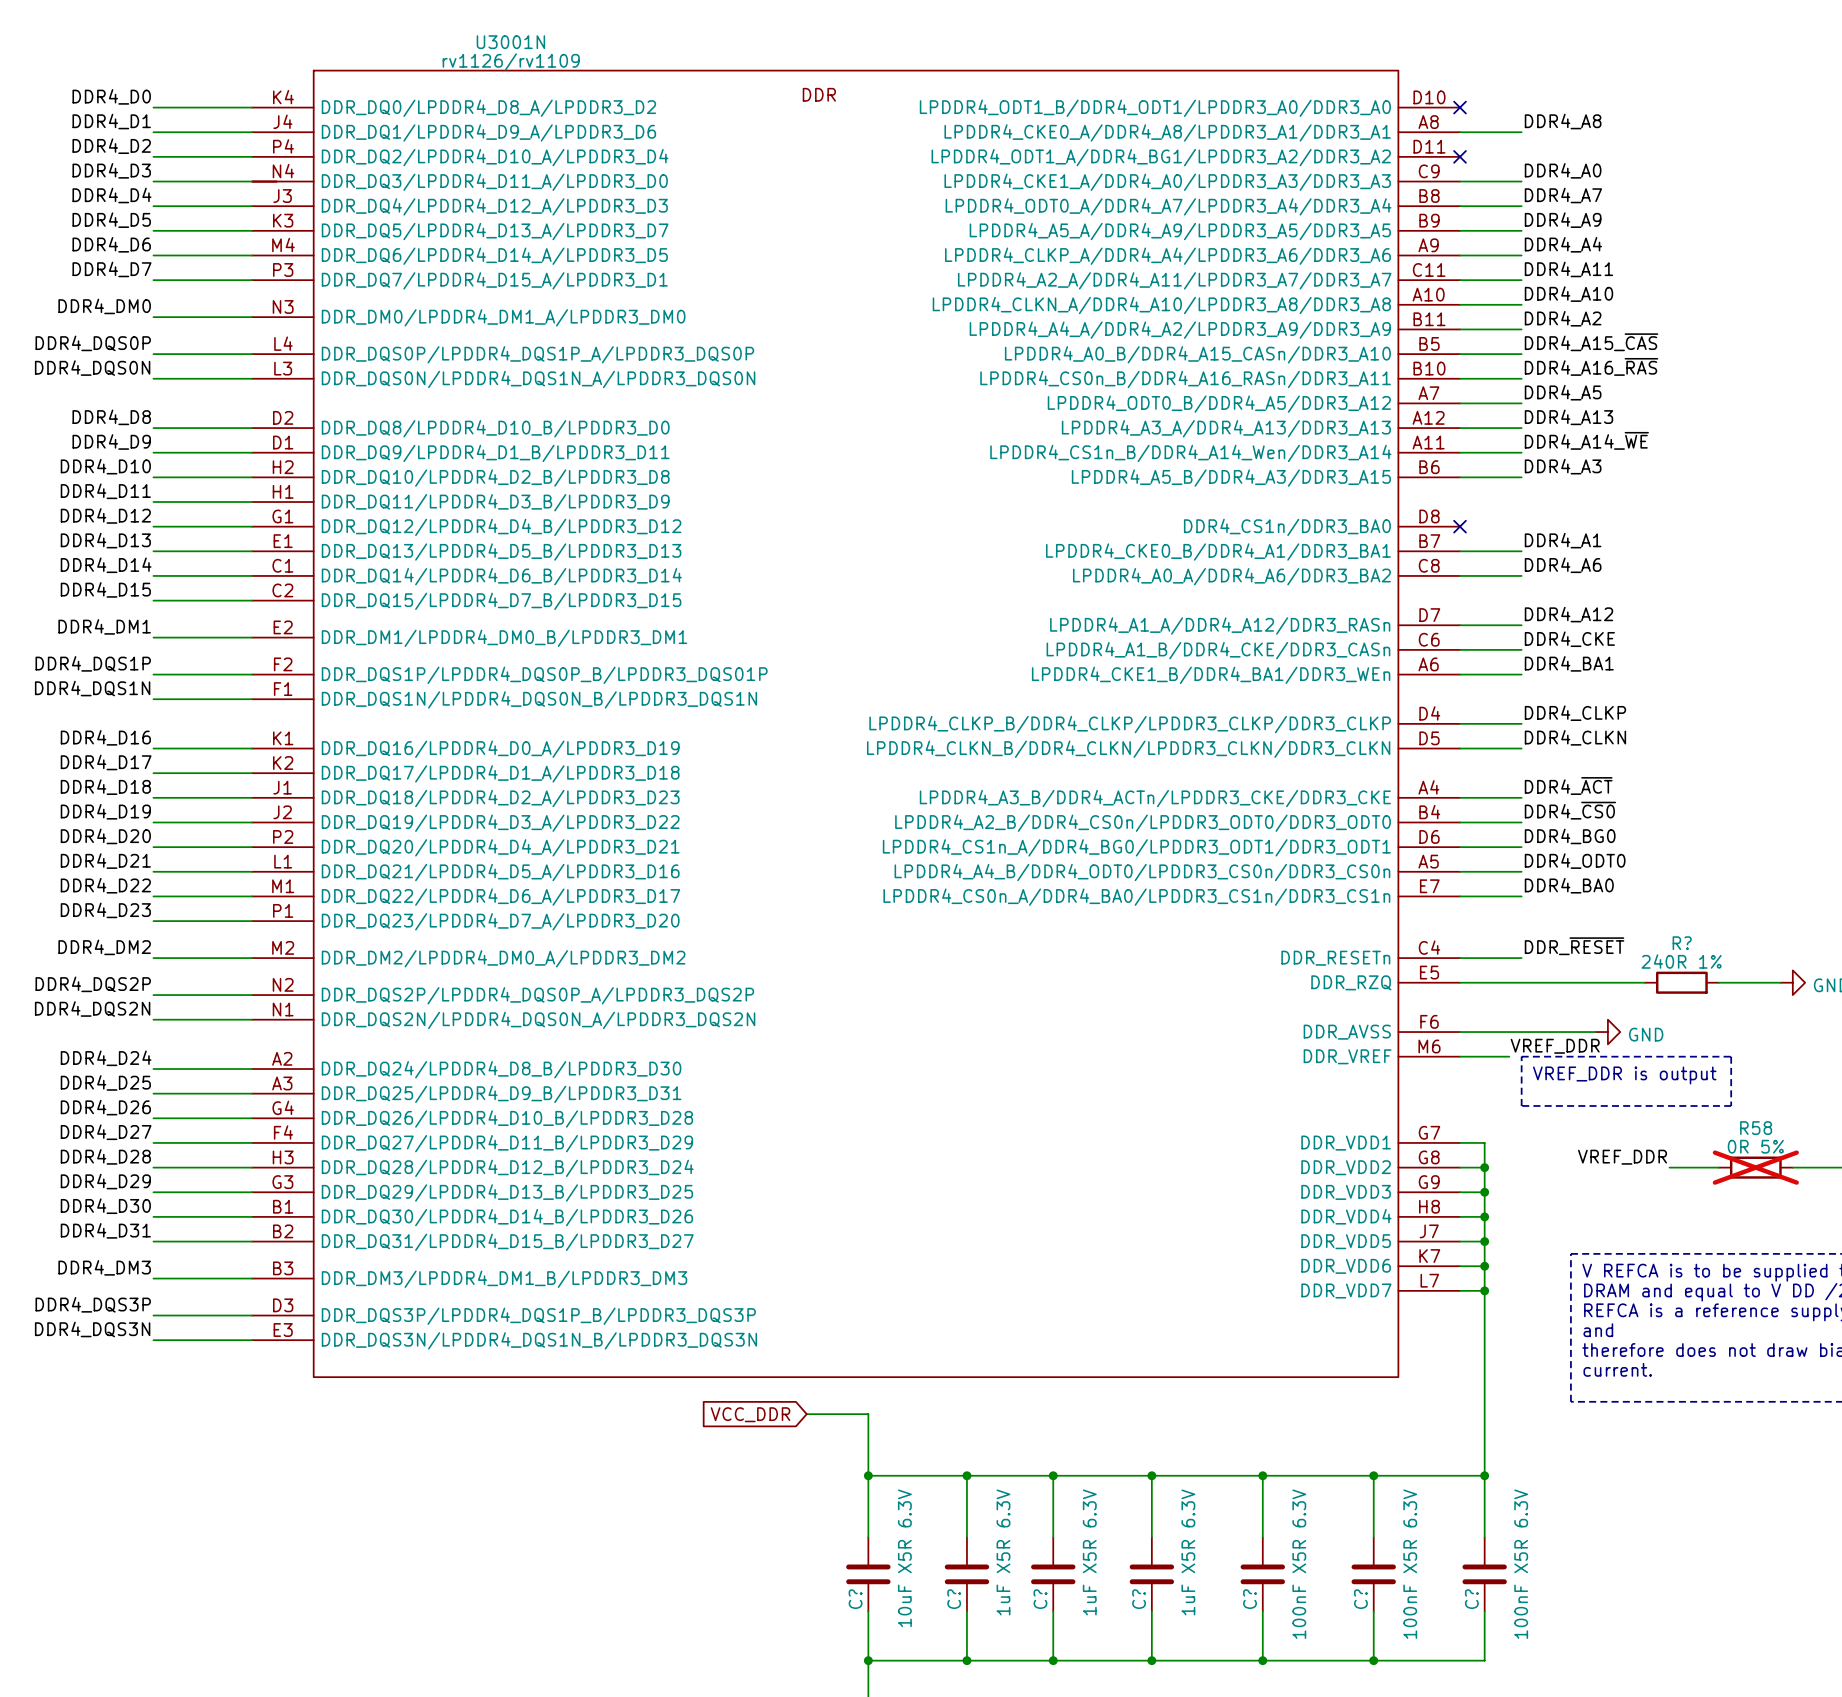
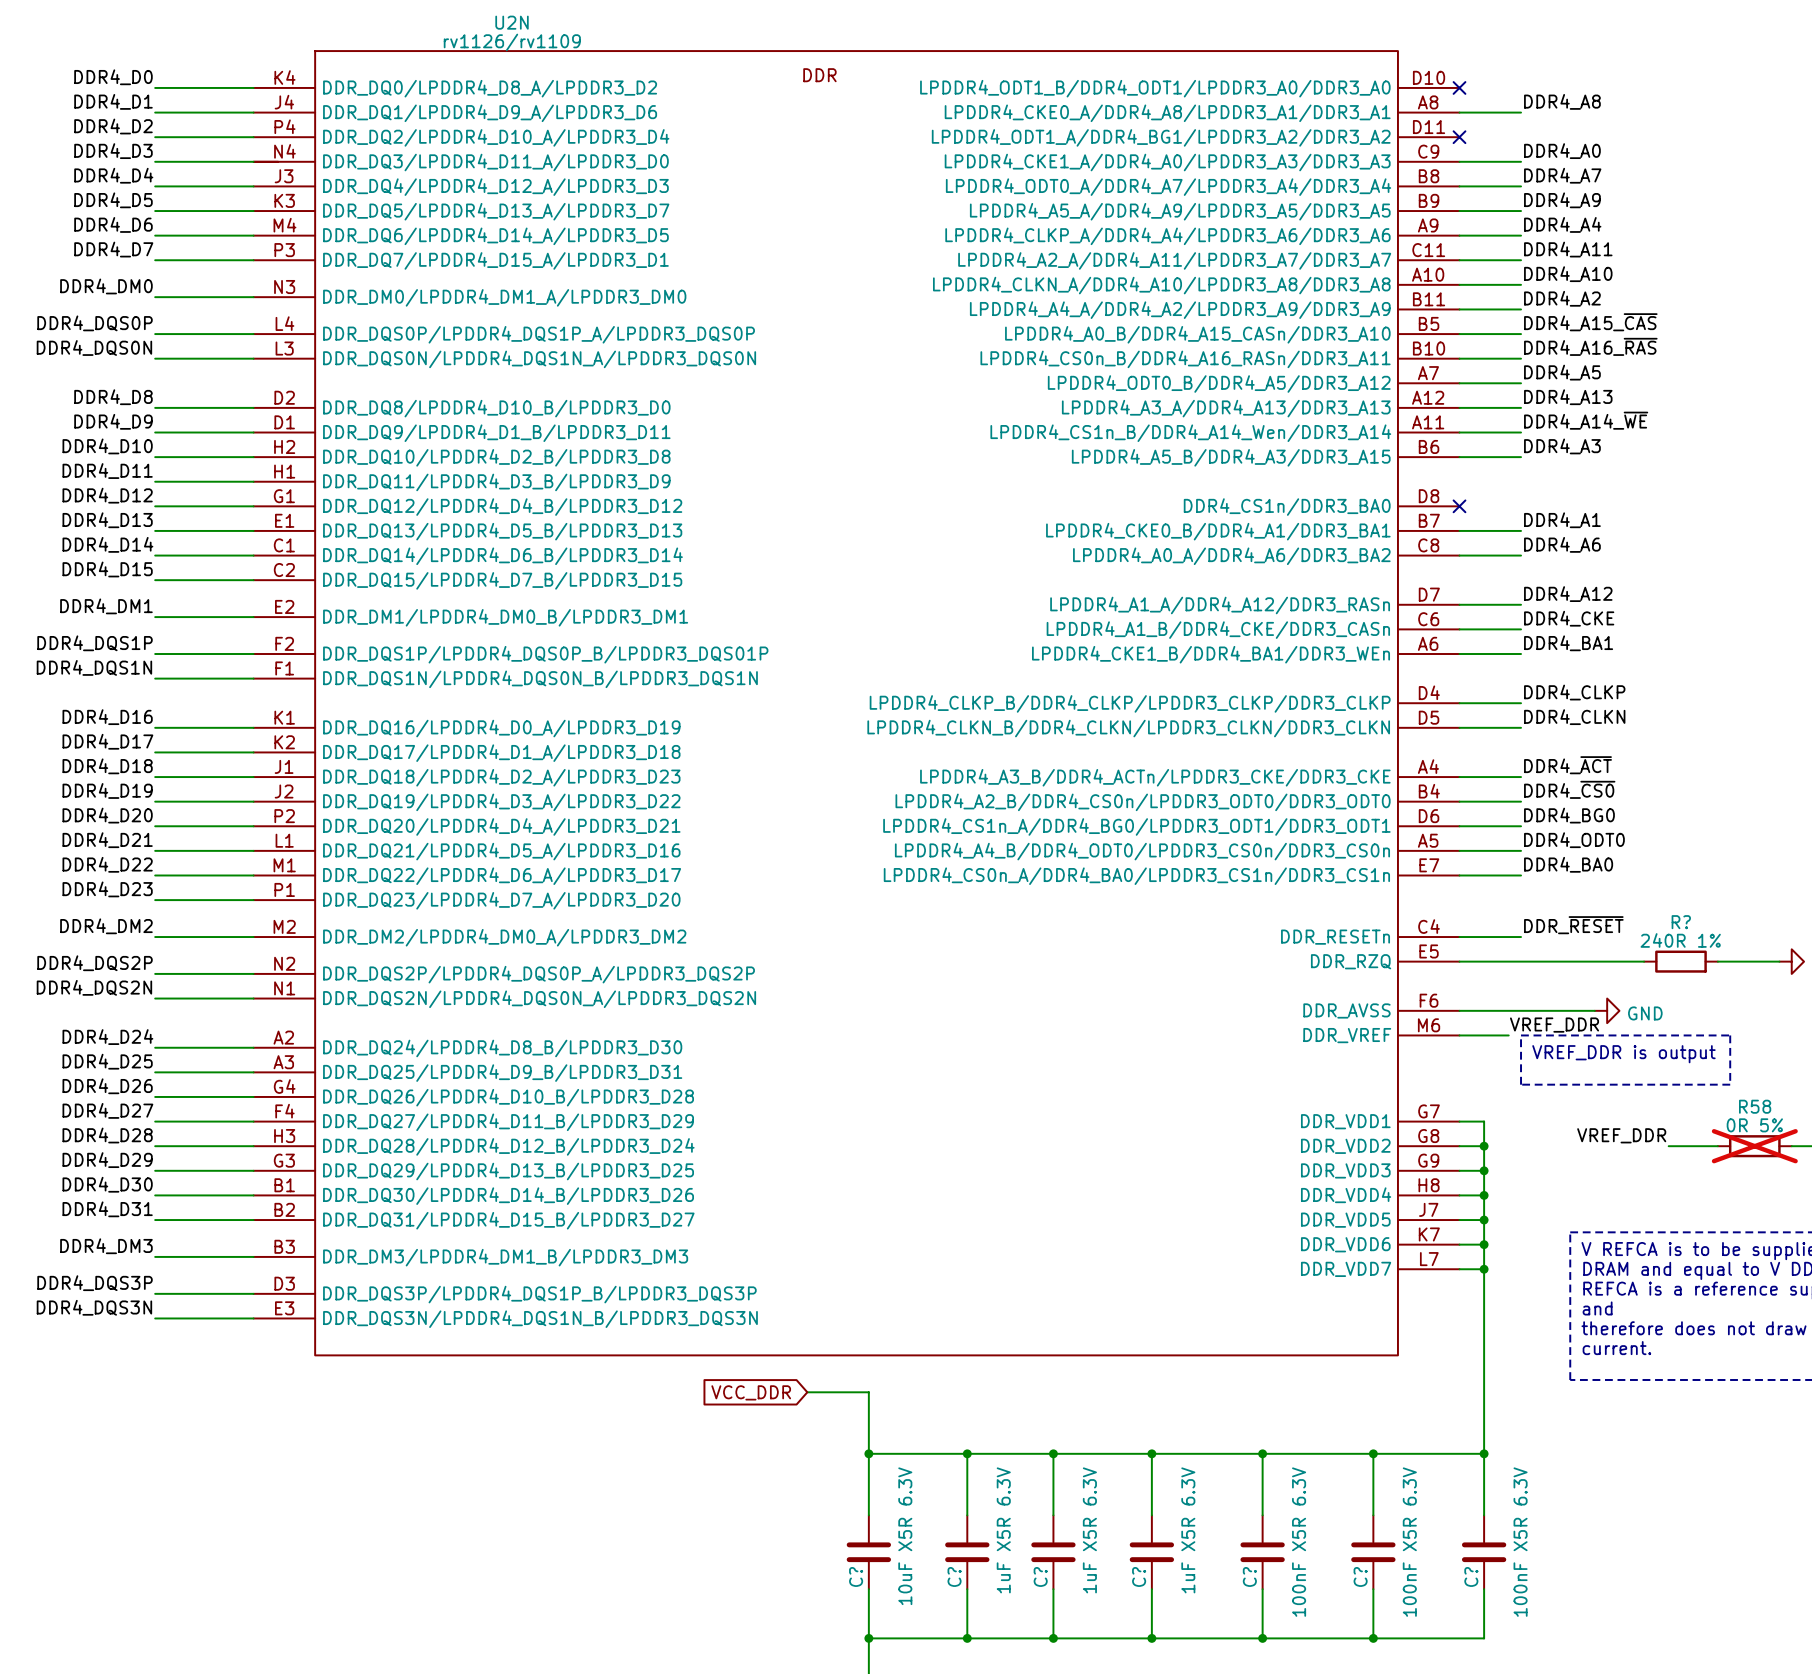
U3001N name: U3001N (510, 42) -> U2N (512, 22)

